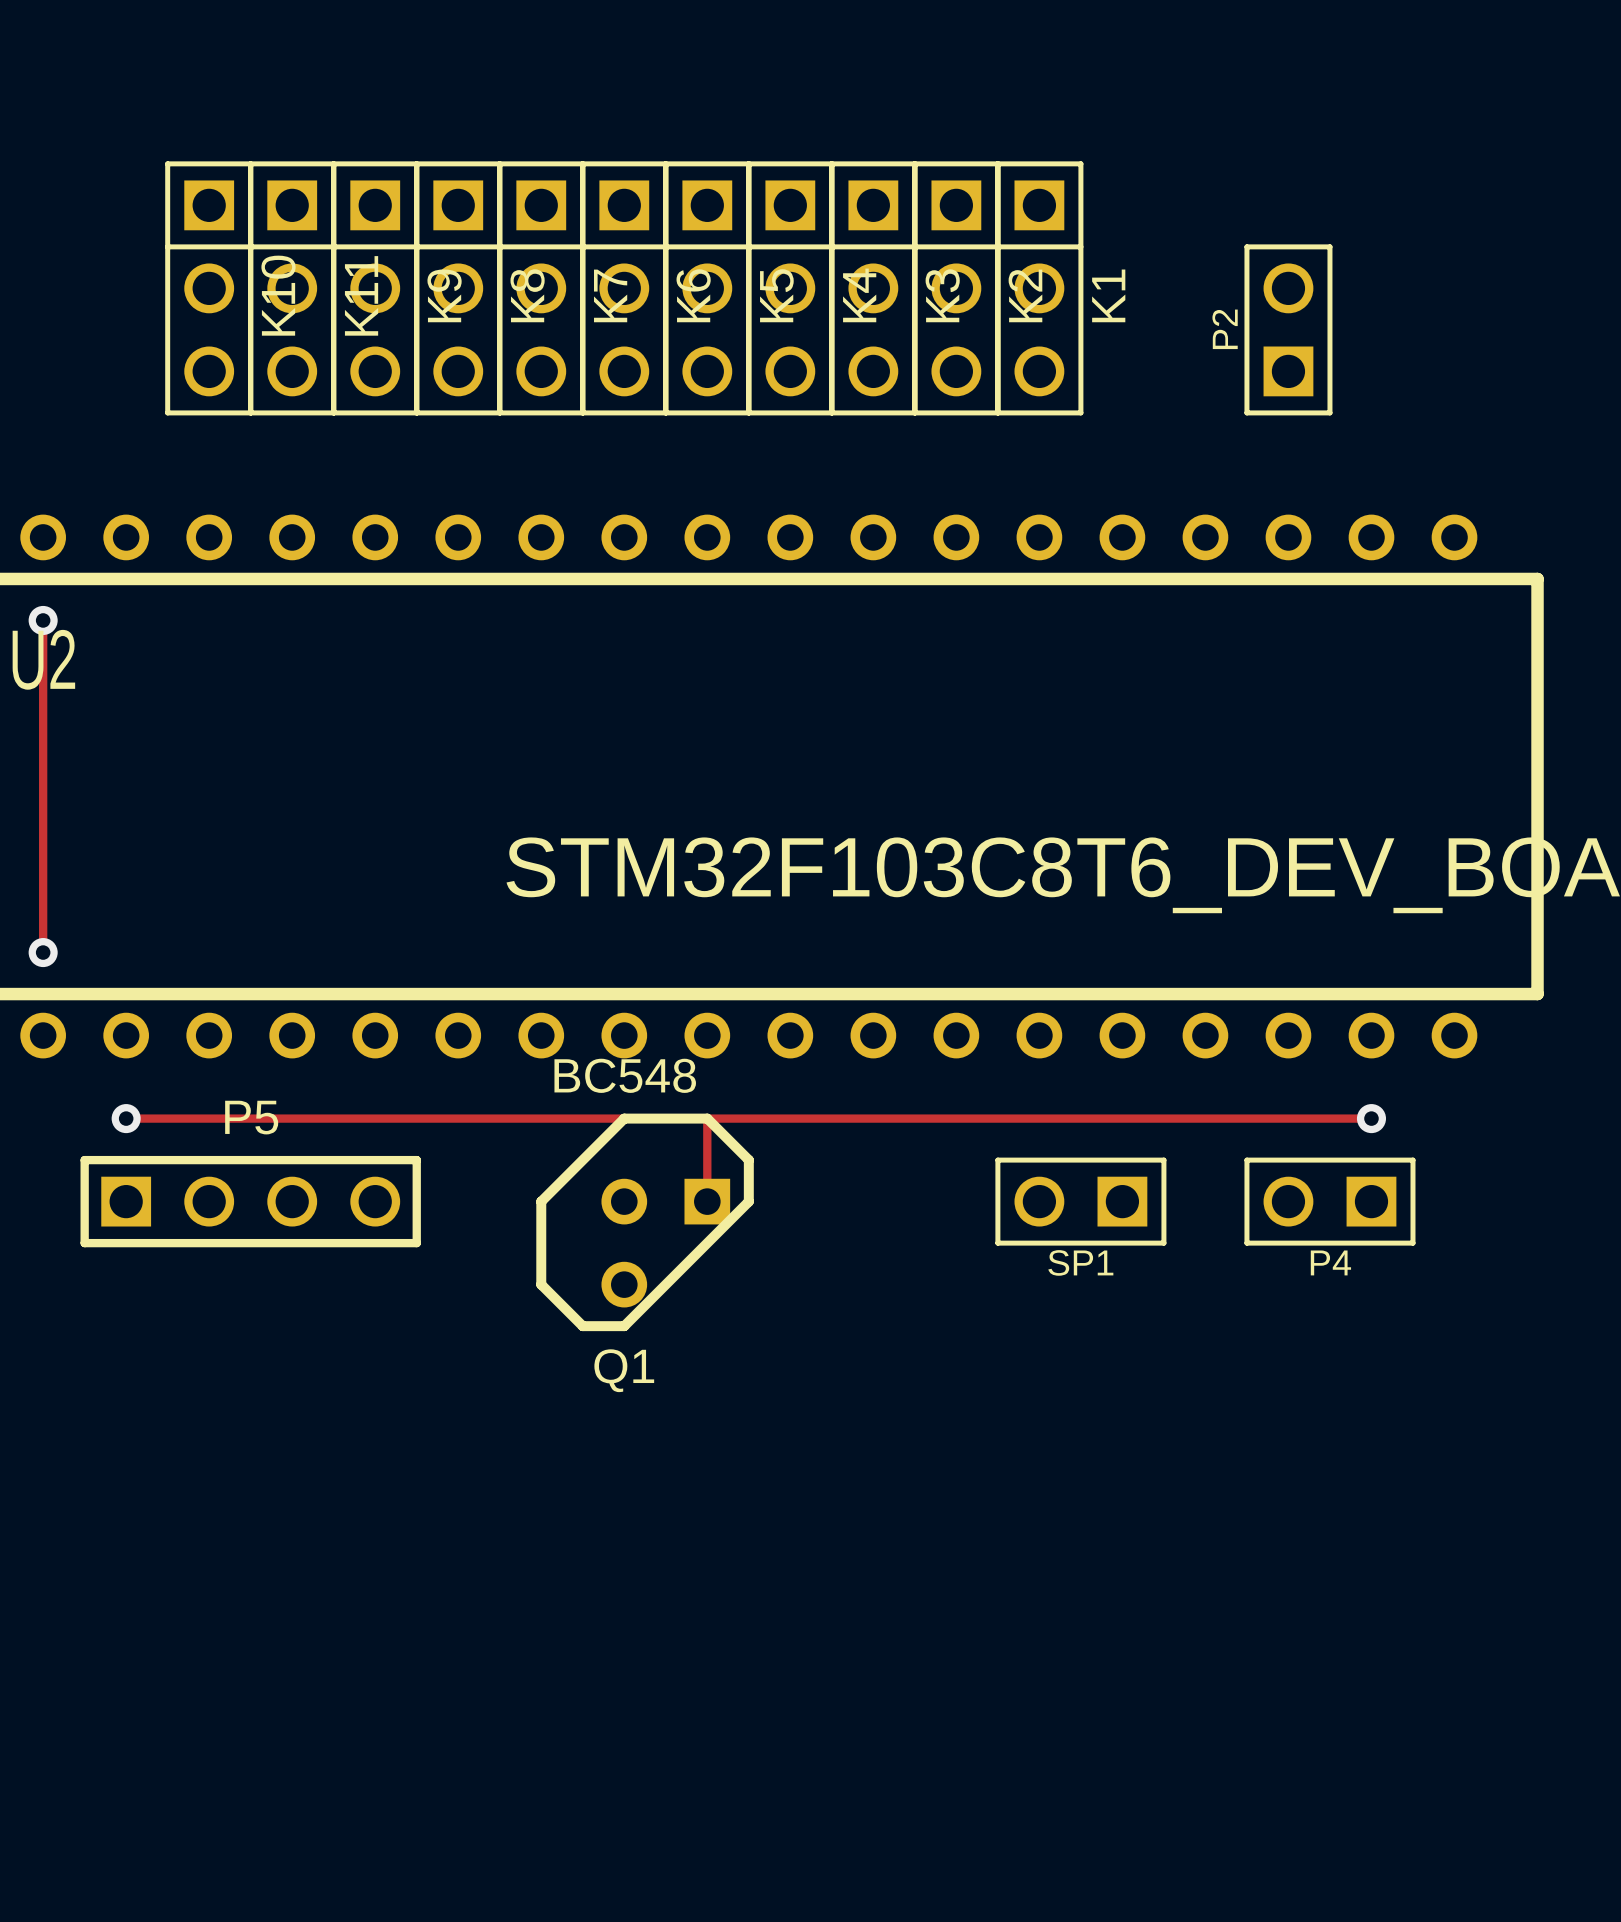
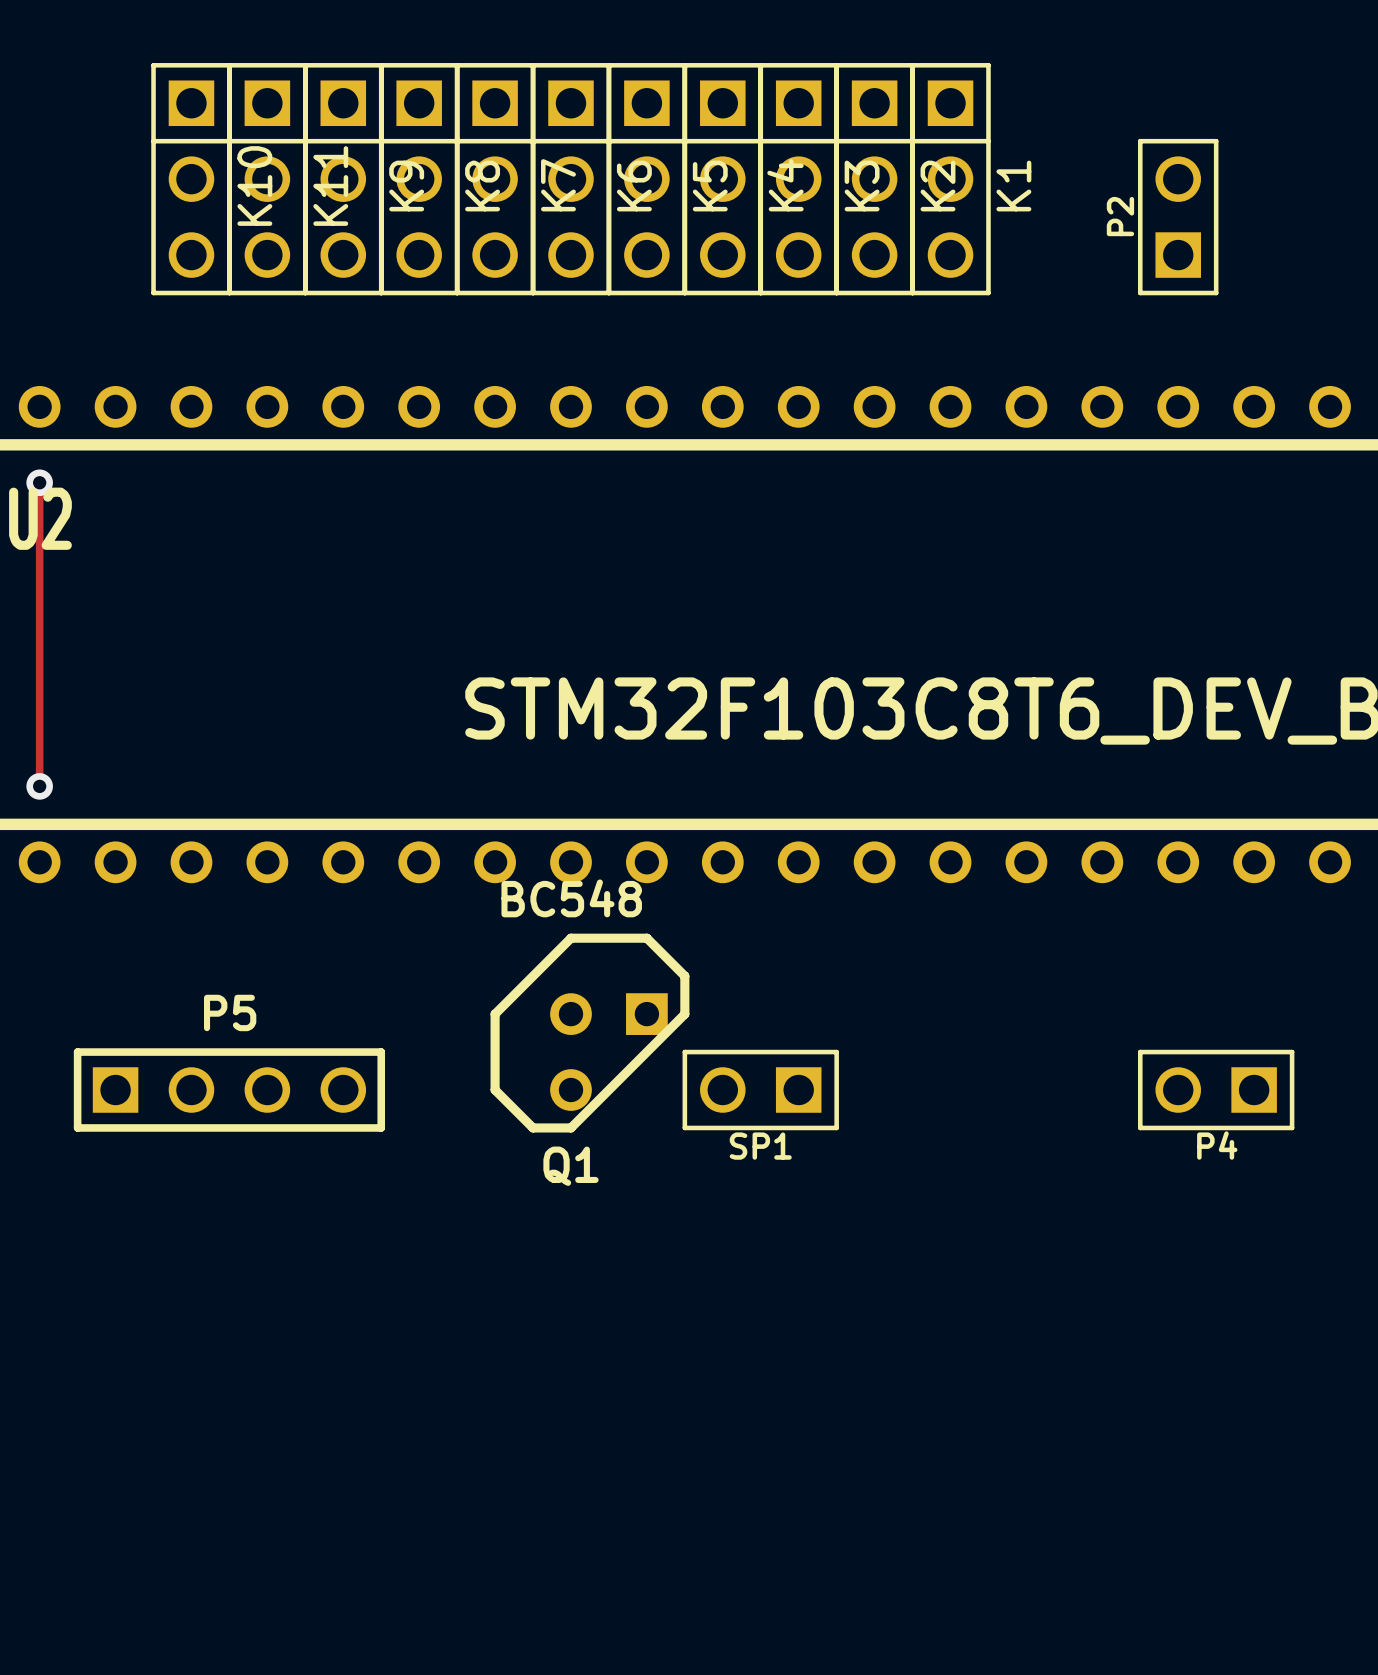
track: (126, 1118) (1371, 1118) -> none
via: (126, 1118) -> none
track: (707, 1118) (707, 1201) -> none
via: (1371, 1118) -> none
P5 position: (250, 1201) -> (229, 1090)
SP1 position: (1080, 1201) -> (760, 1090)
P4 position: (1329, 1201) -> (1216, 1090)

